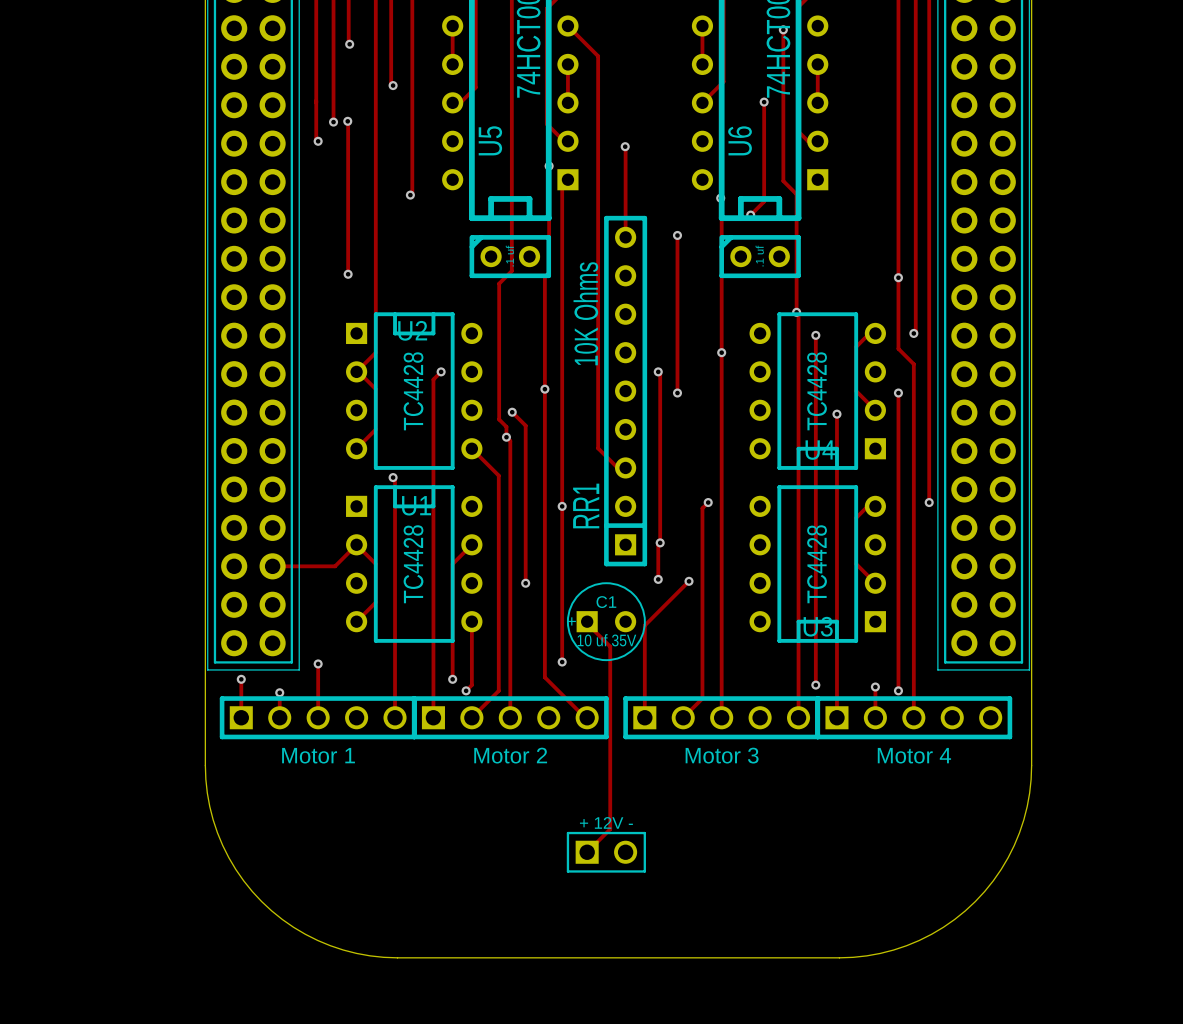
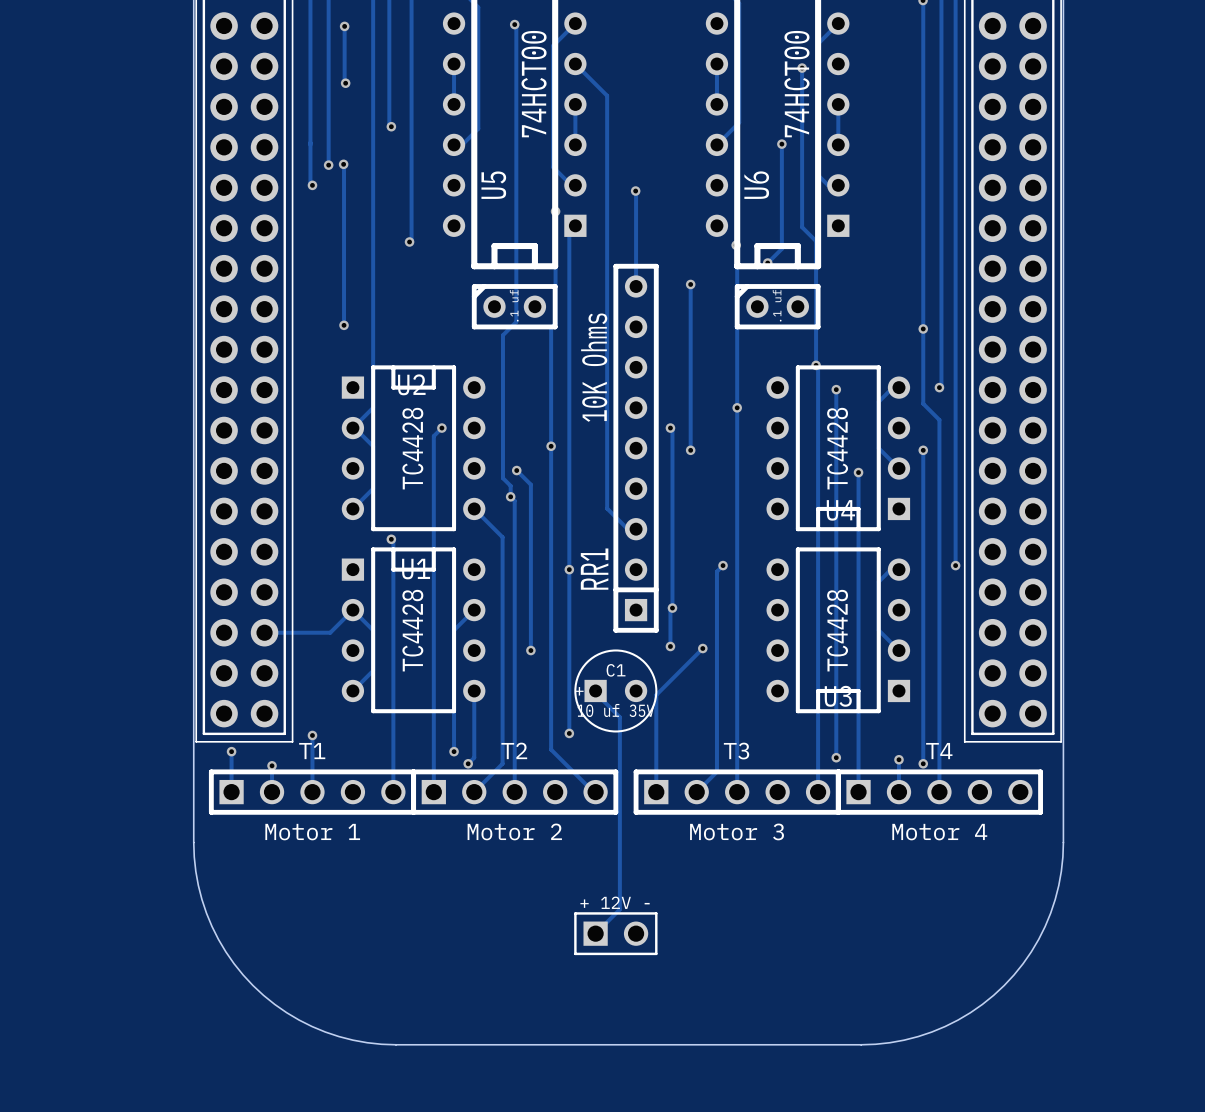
T1 name: none -> T1 (312, 751)
T2 name: none -> T2 (514, 750)
T3 name: none -> T3 (736, 751)
T4 name: none -> T4 (939, 751)

